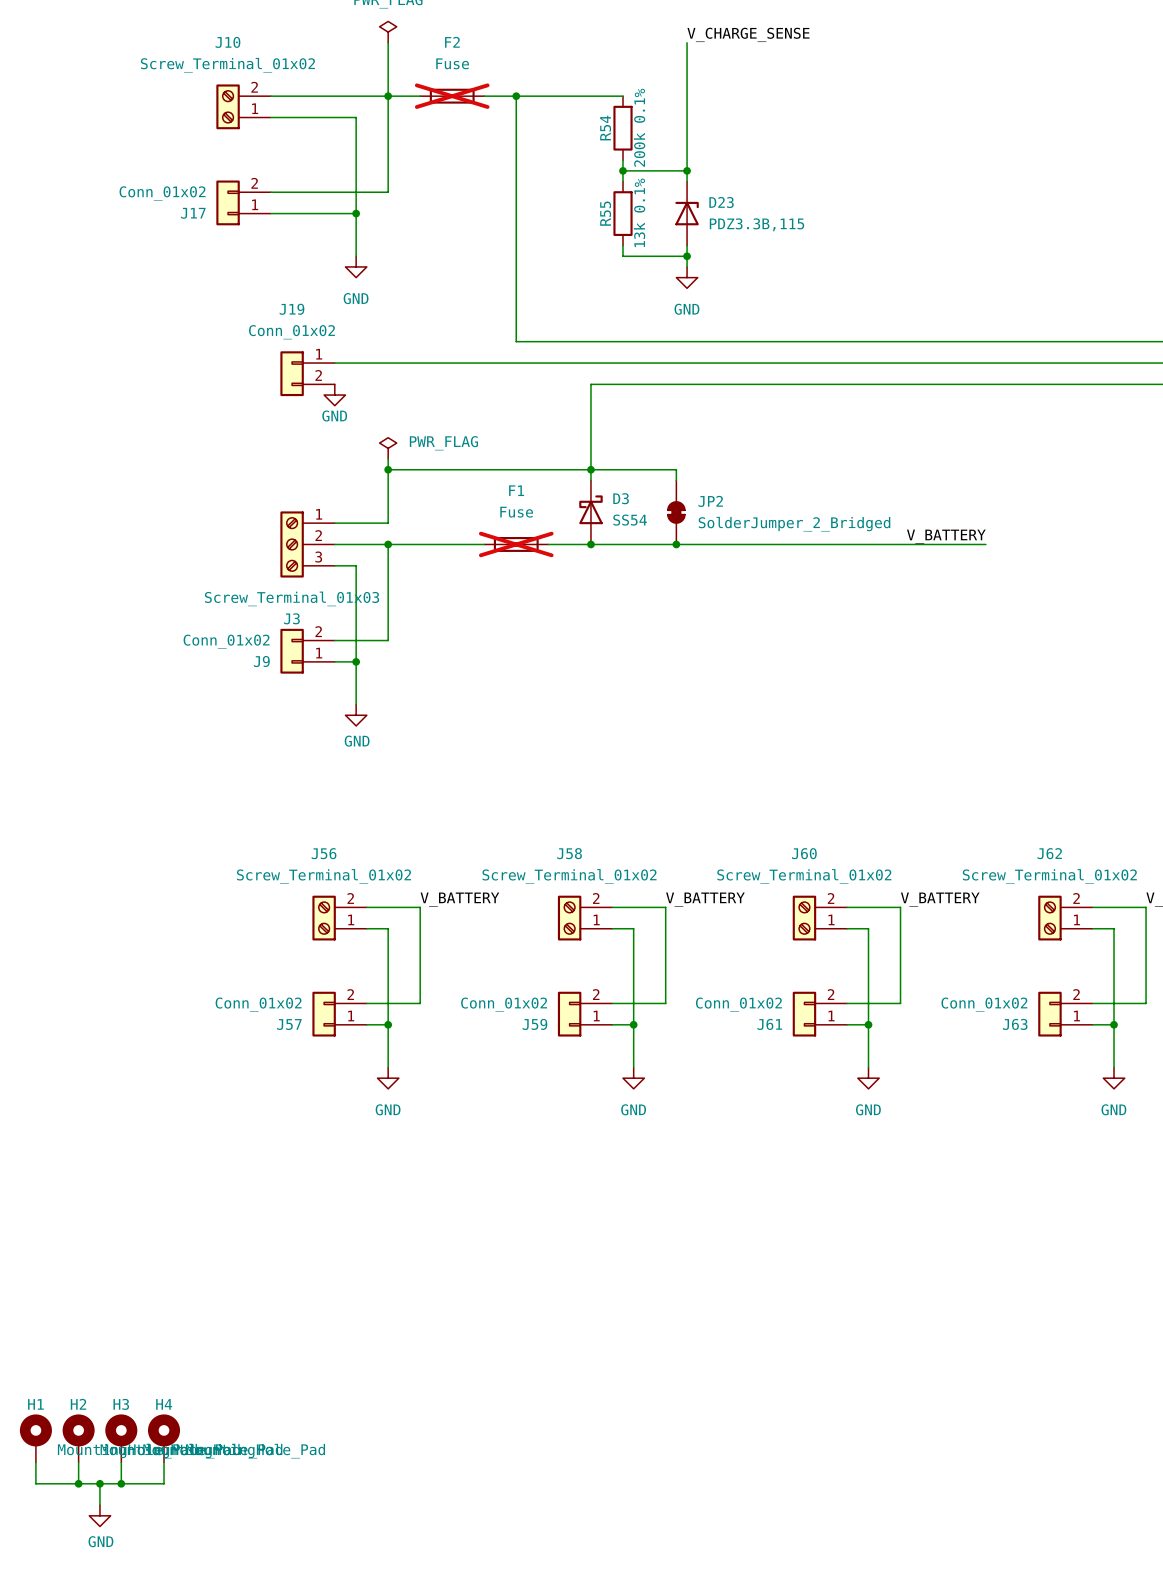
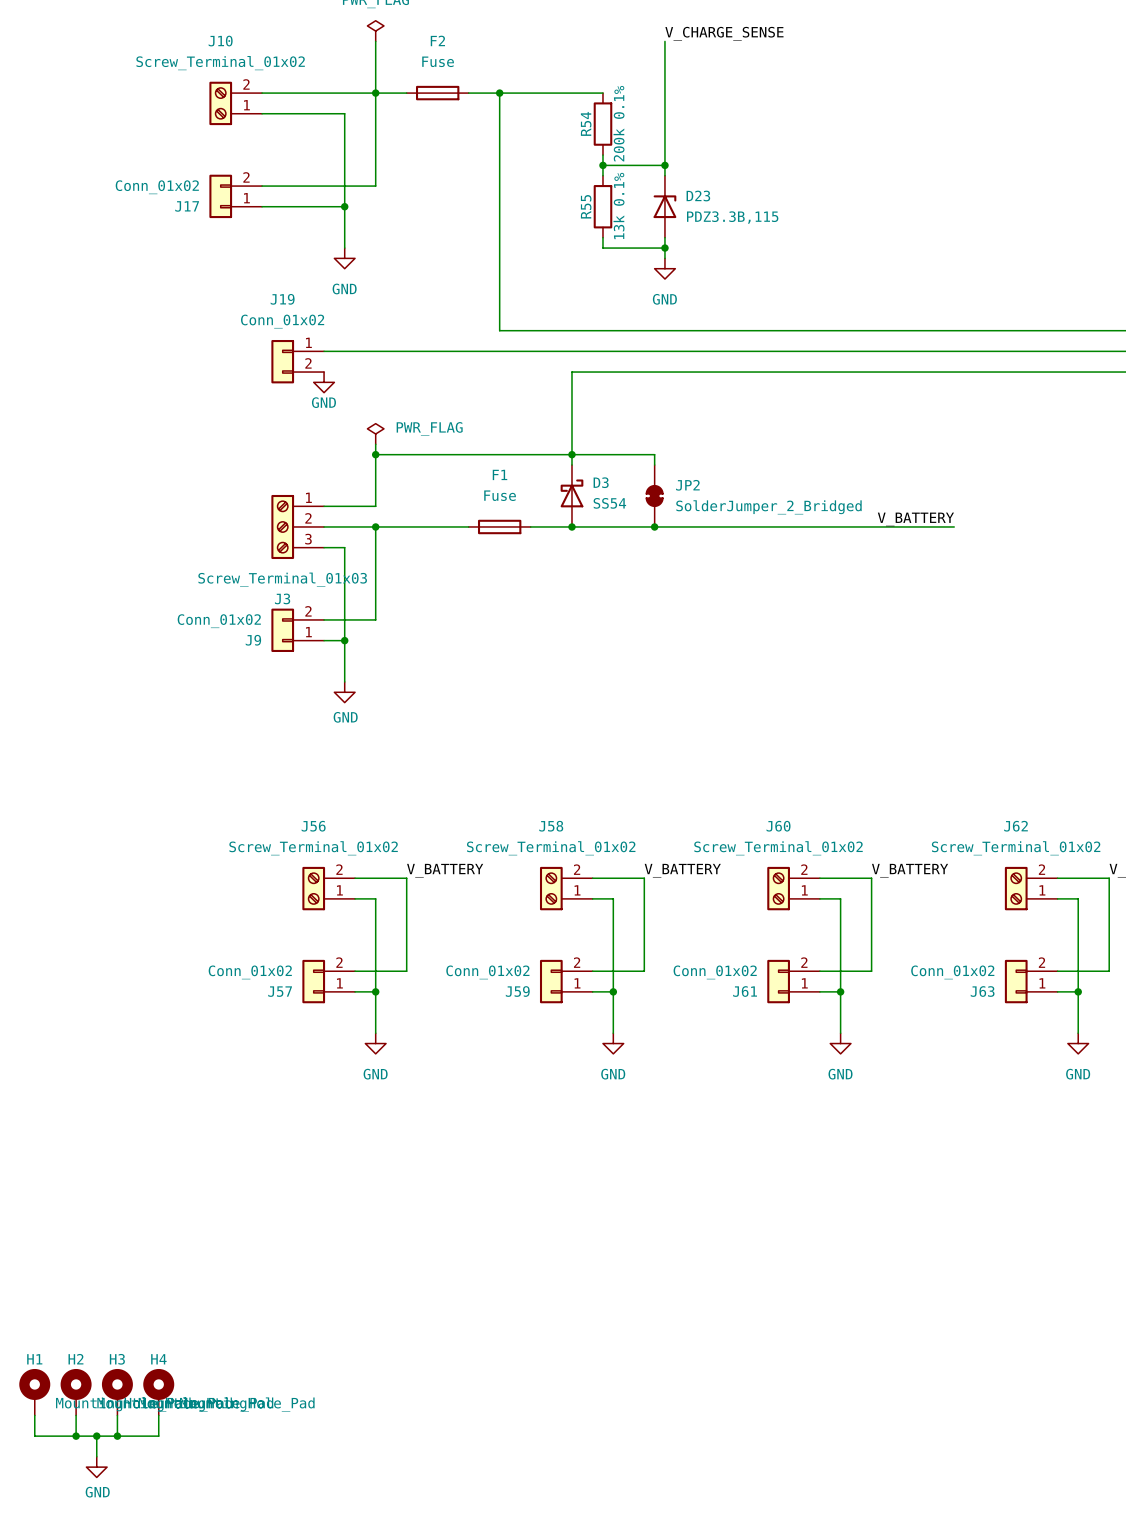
F2 do-not-place cross: (452, 96) -> none
F1 do-not-place cross: (516, 544) -> none

